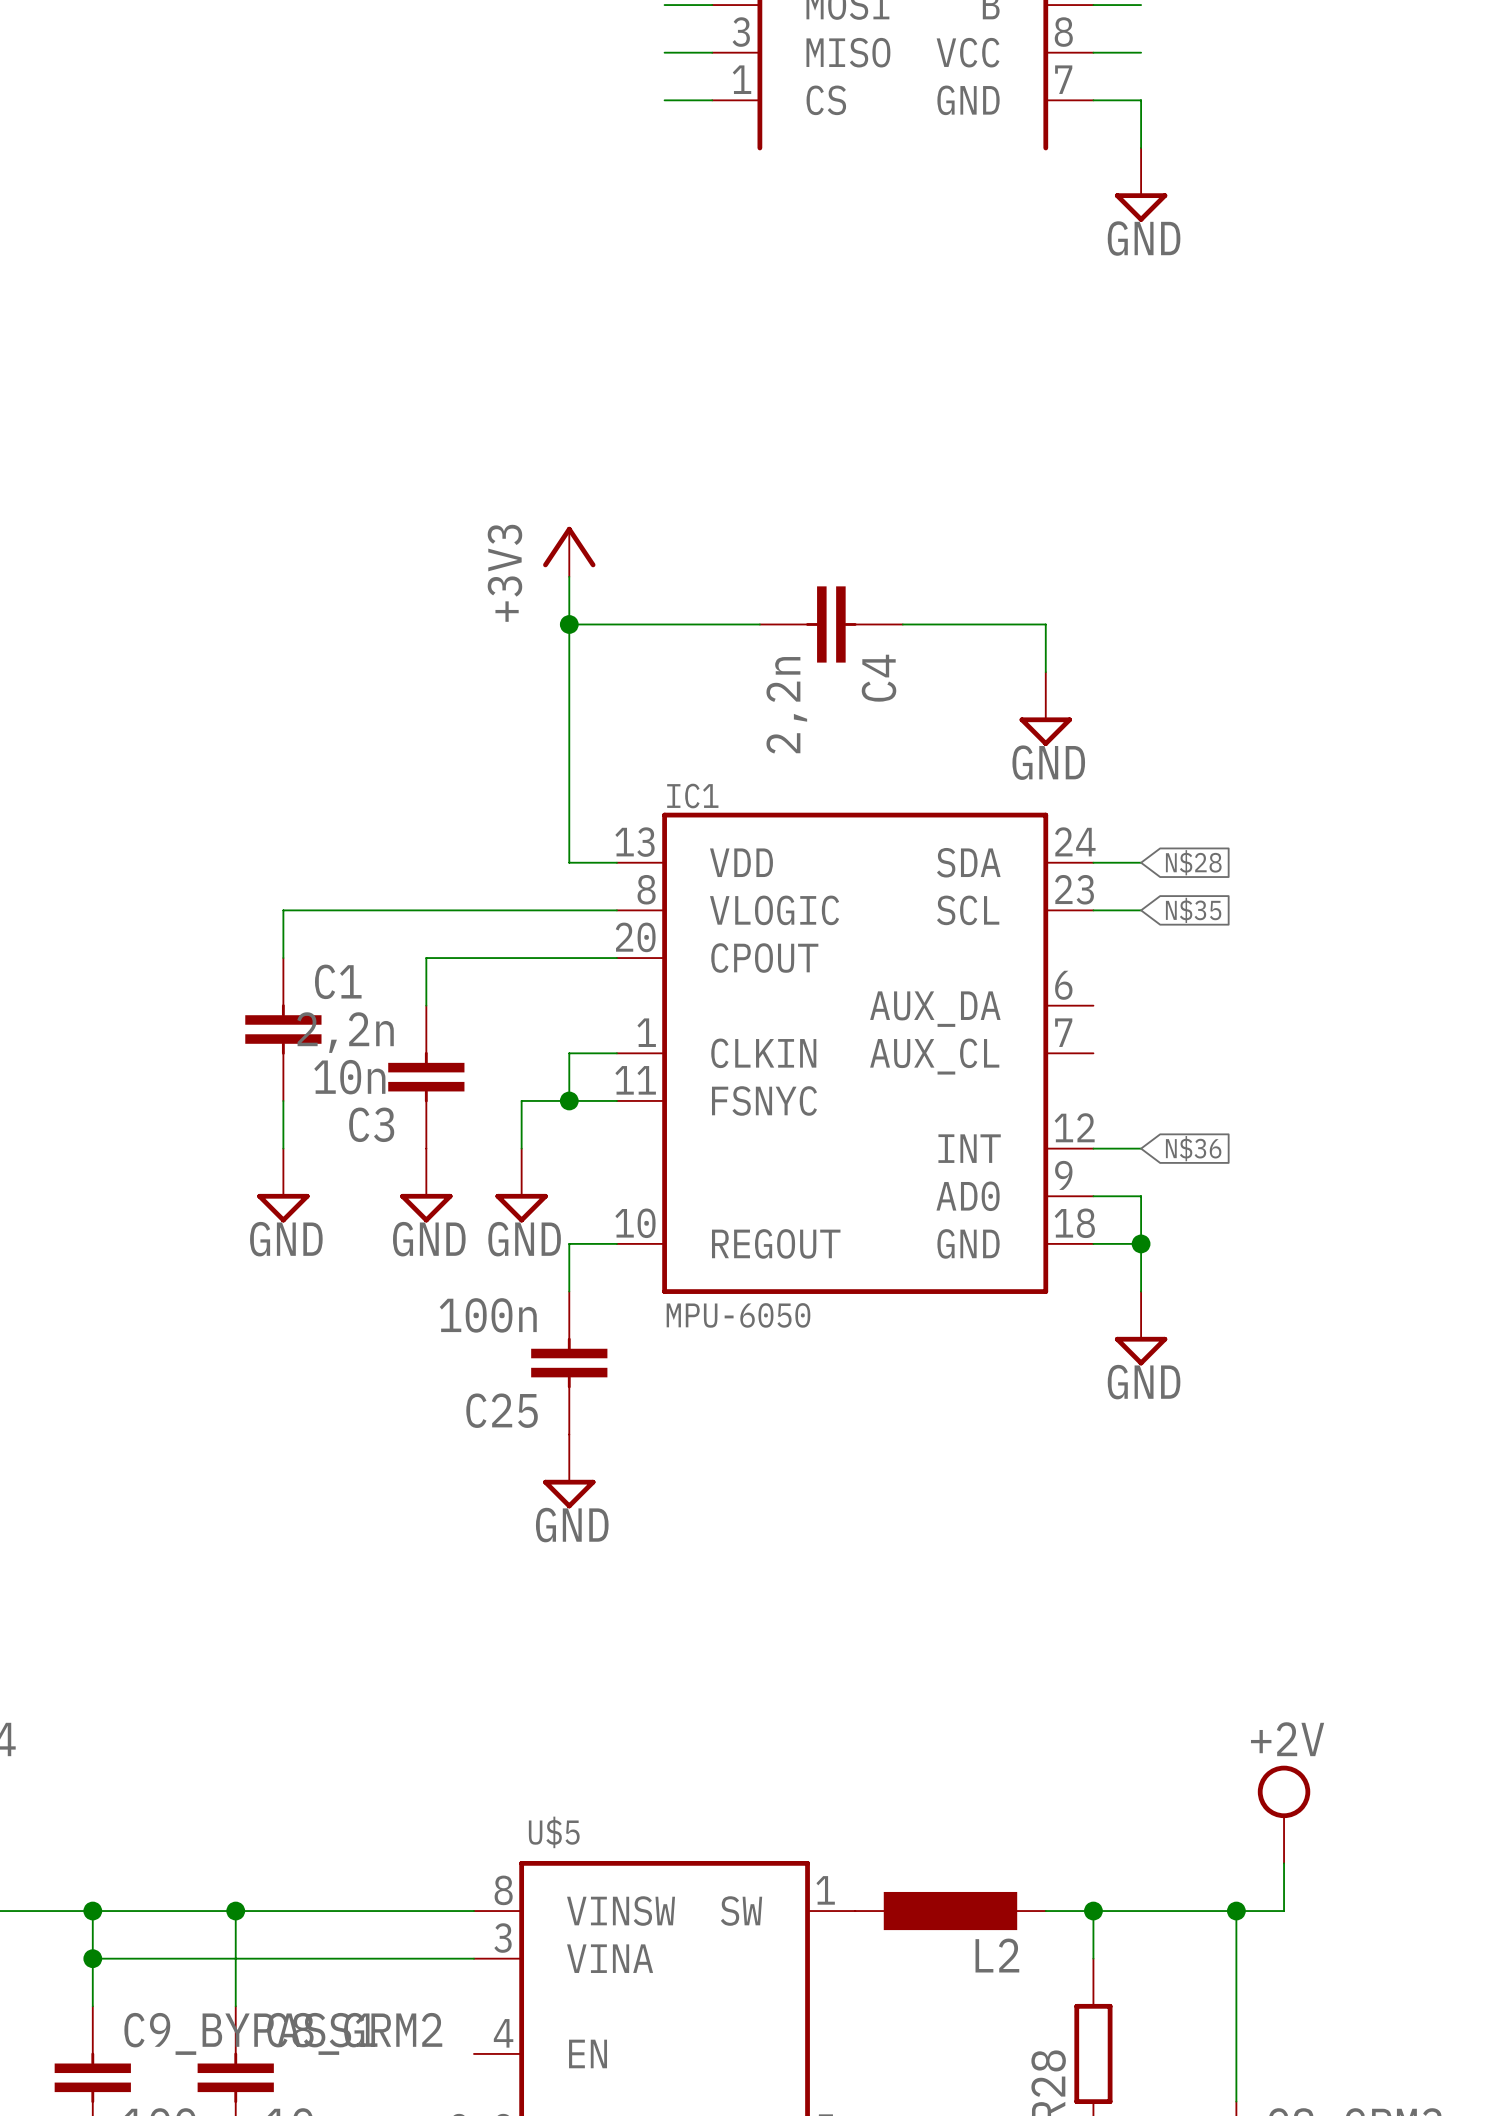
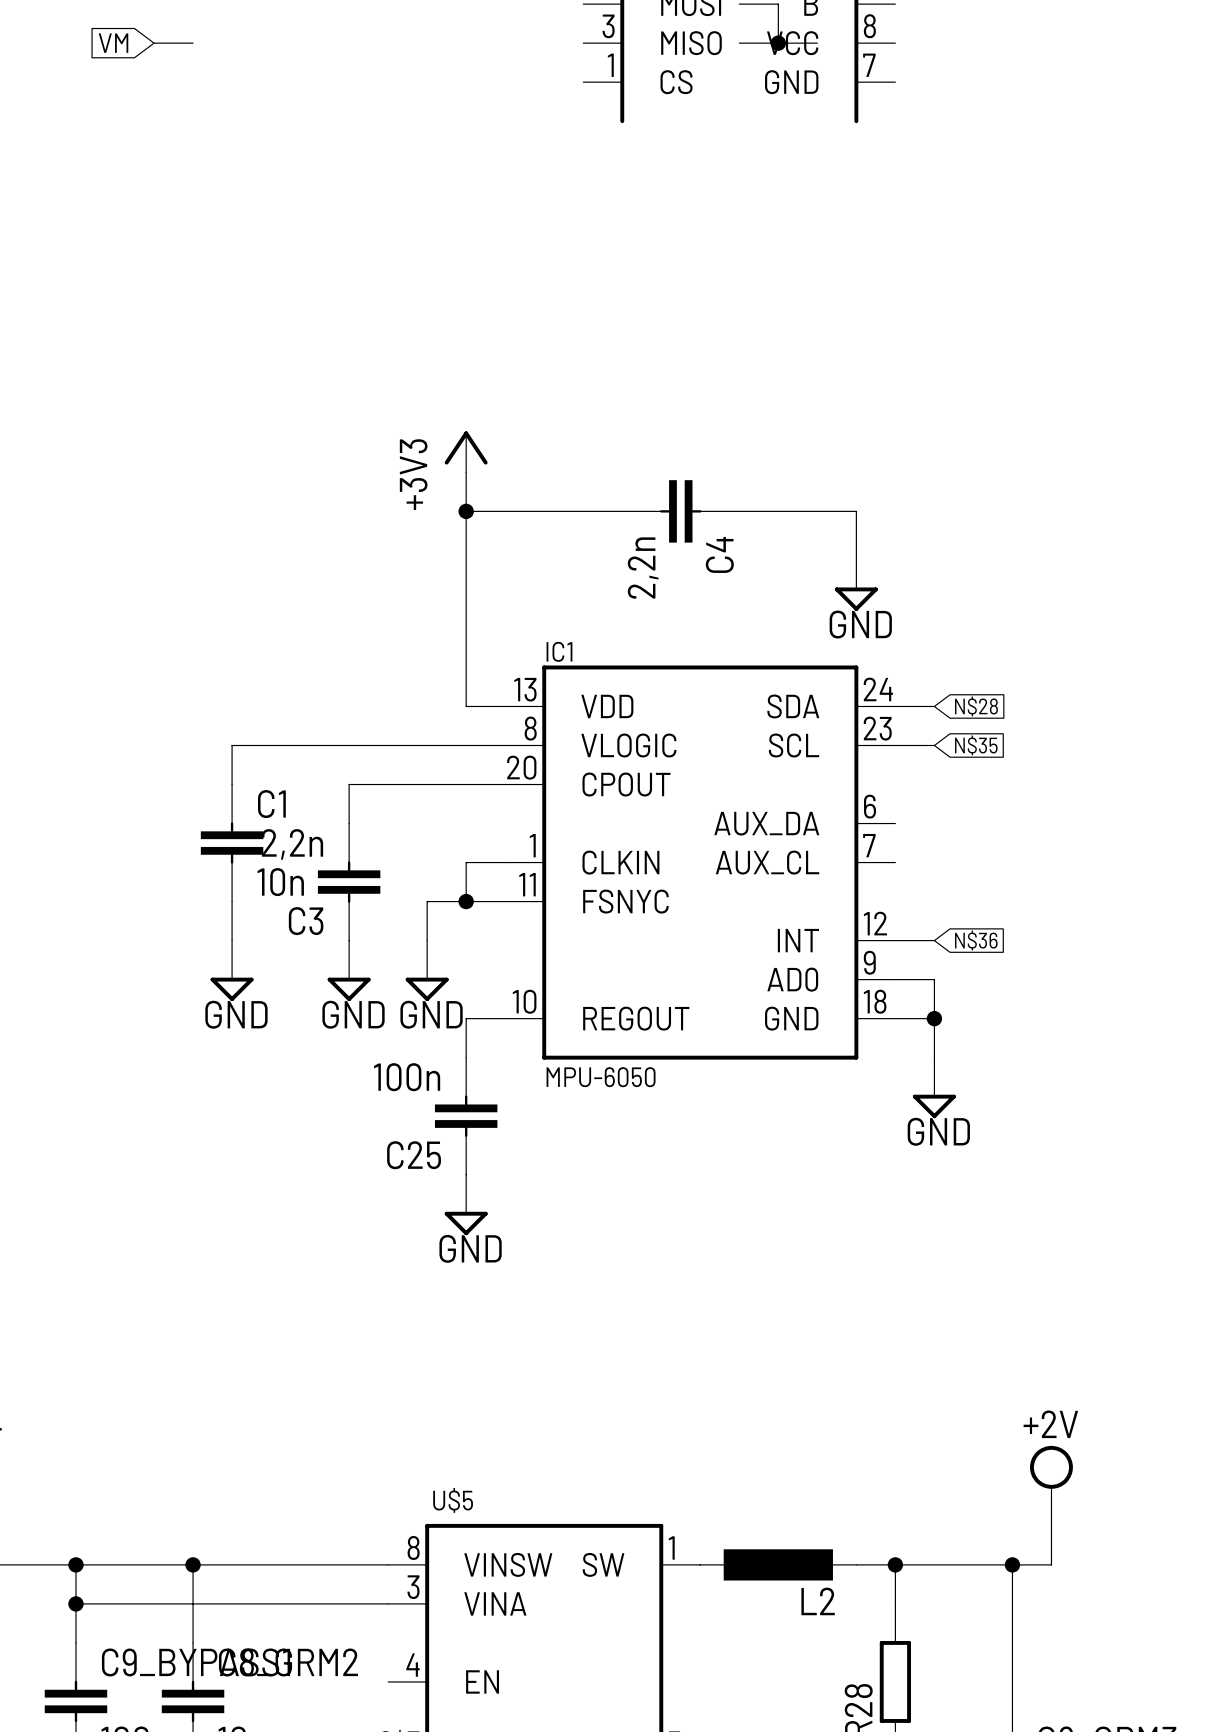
wire: (664, 5) (712, 5) -> none
wire: (1093, 5) (1141, 5) -> none
global label: none -> VM (113, 43)
wire: none -> (154, 43) (193, 43)
wire: (664, 52) (712, 52) -> none
wire: none -> (739, 43) (817, 43)
junction: none -> (778, 43)
wire: (1093, 52) (1141, 52) -> none
wire: (664, 100) (712, 100) -> none
wire: (1093, 100) (1141, 100) (1141, 147) -> (739, 4) (778, 4) (778, 43)
power symbol: GND (1141, 184) -> none

